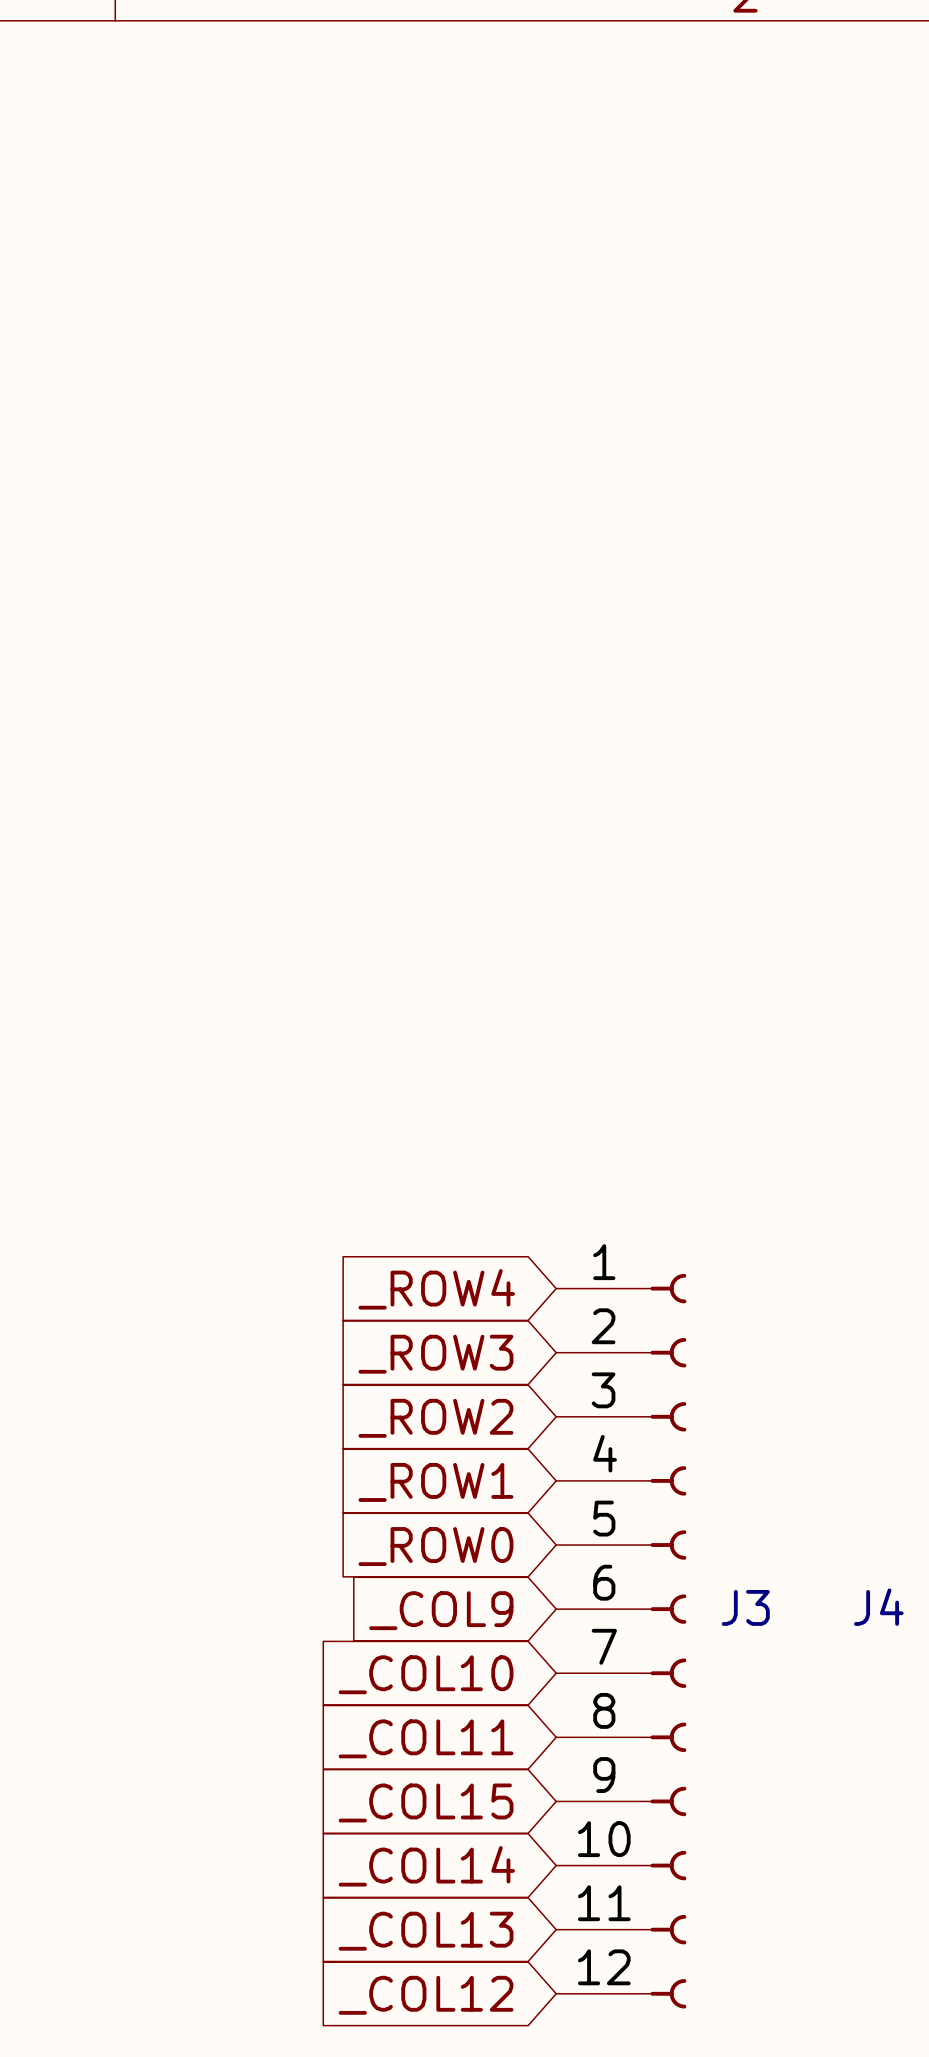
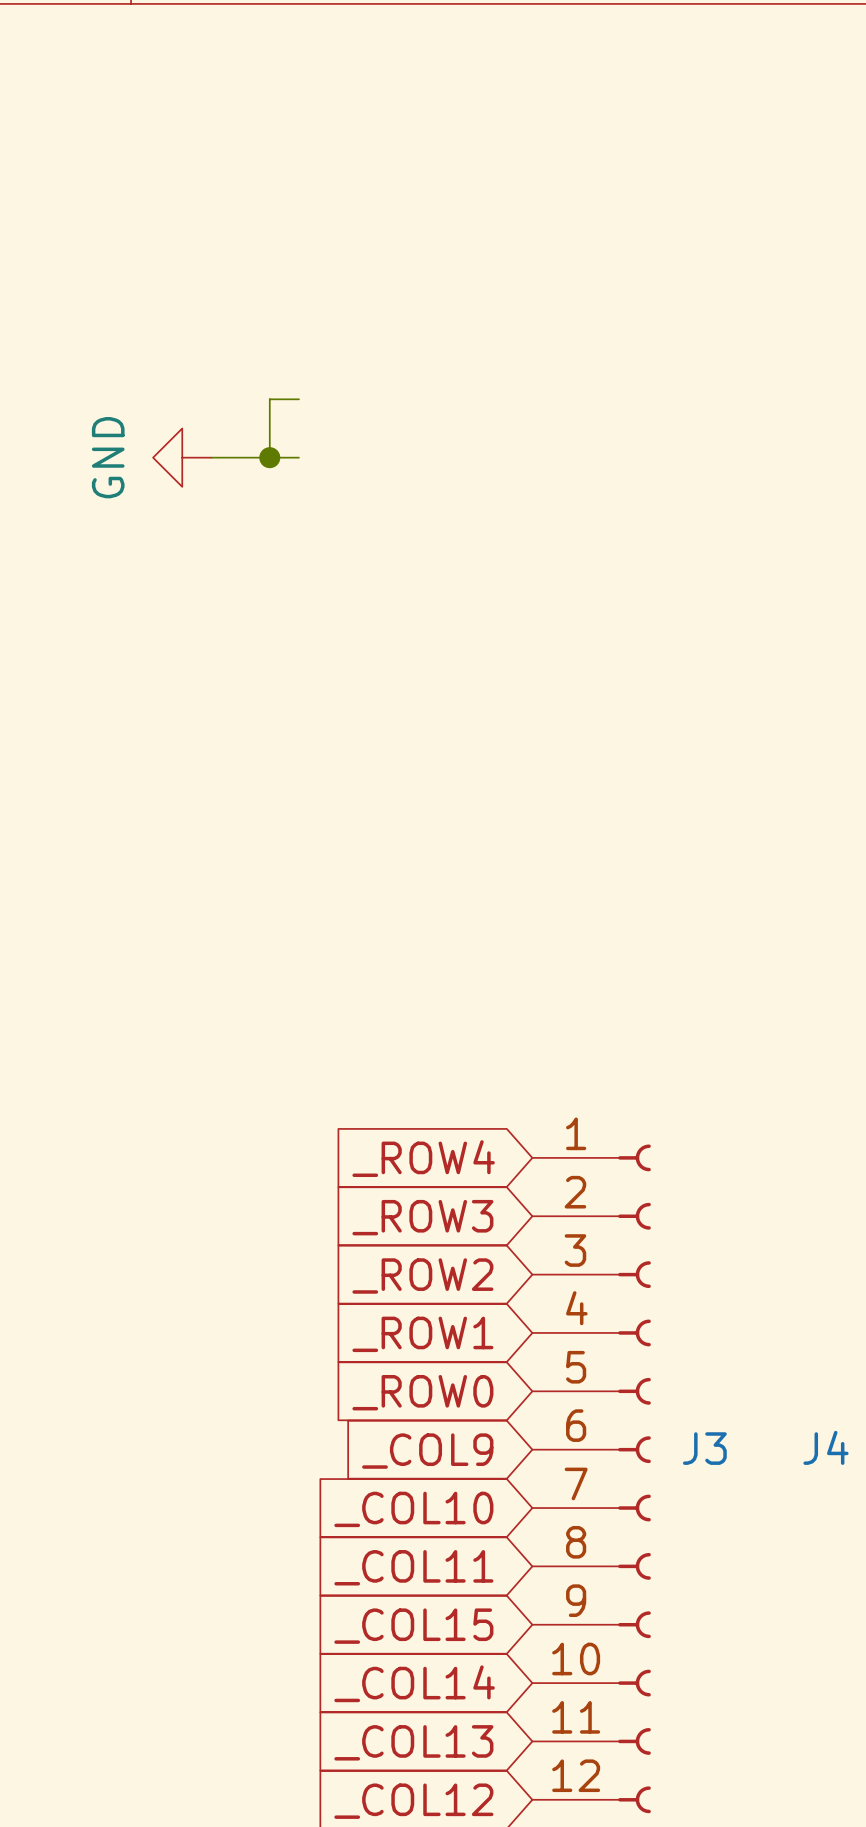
wire: none -> (298, 399) (269, 399) (269, 457)
power symbol: none -> GND (182, 457)
wire: none -> (211, 457) (298, 457)
junction: none -> (269, 457)

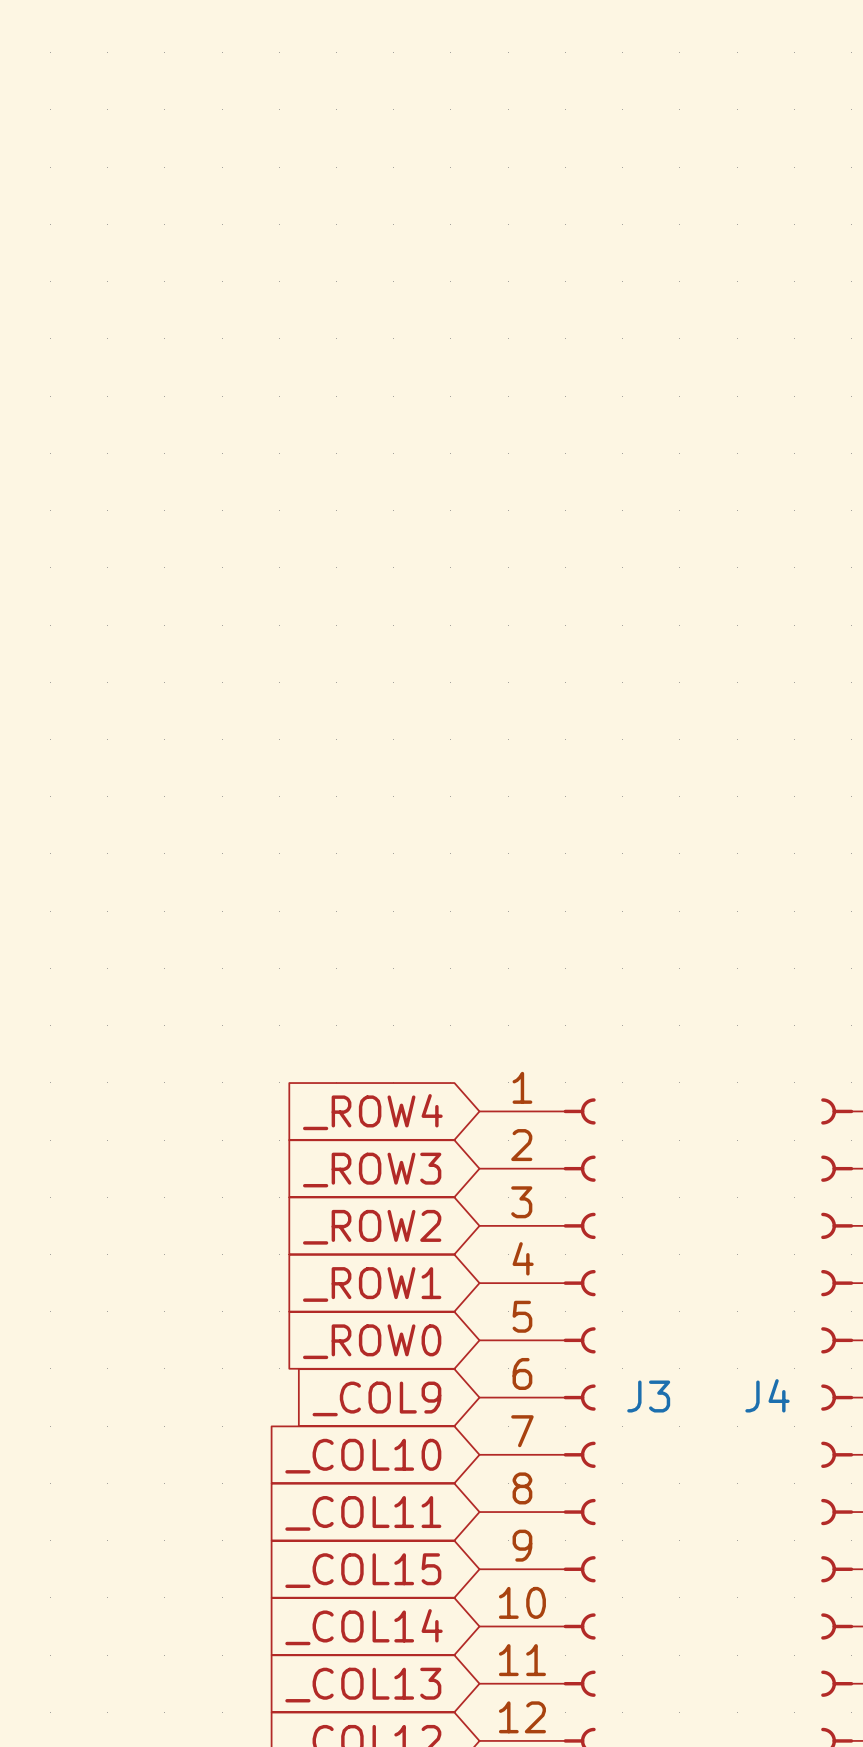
wire: (298, 399) (269, 399) (269, 457) -> none
power symbol: GND (182, 457) -> none
wire: (211, 457) (298, 457) -> none
junction: (269, 457) -> none

